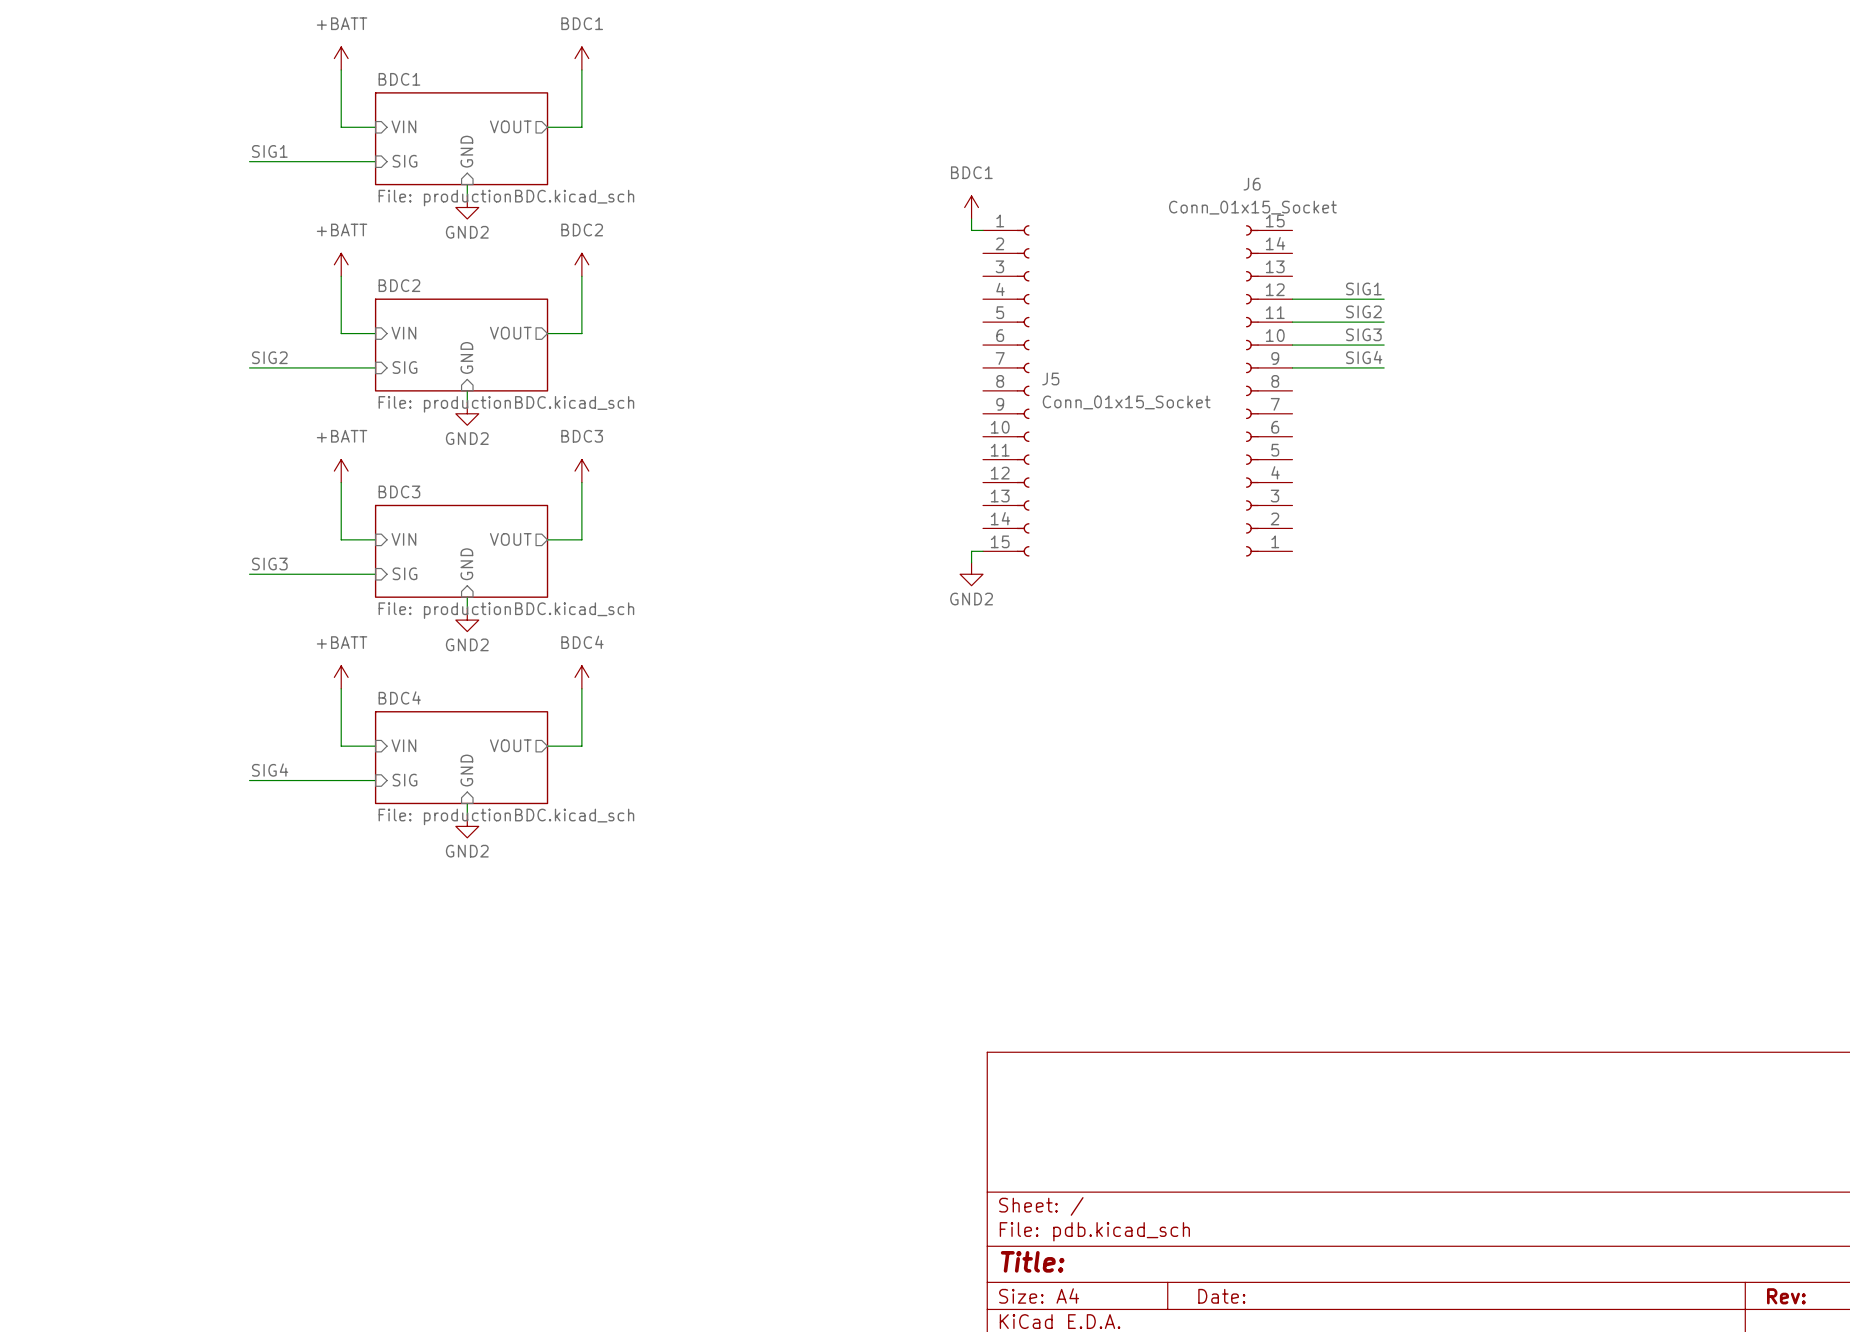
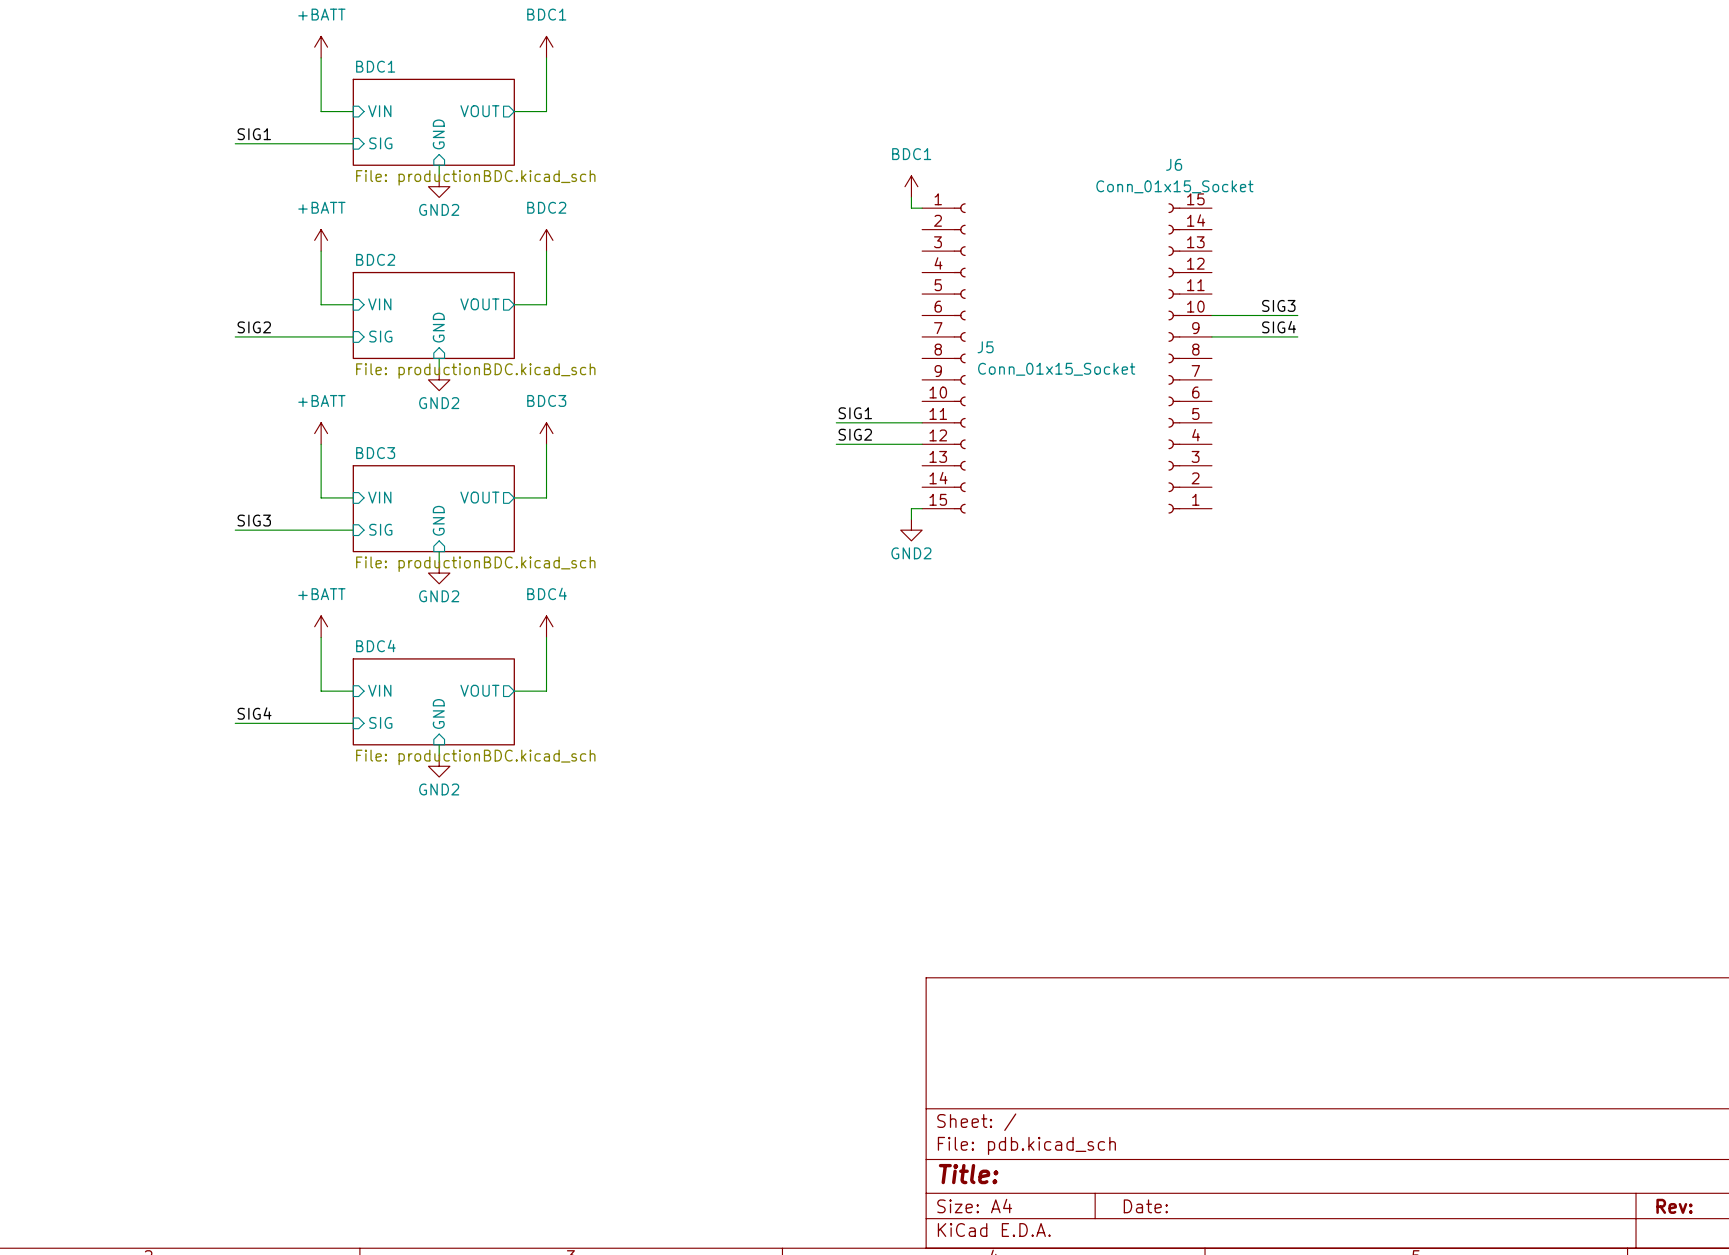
label: SIG1 (1363, 288) -> none
wire: (1292, 299) (1384, 299) -> none
label: SIG2 (1363, 311) -> none
wire: (1292, 322) (1384, 322) -> none
label: none -> SIG1 (855, 413)
wire: none -> (836, 422) (922, 422)
label: none -> SIG2 (855, 434)
wire: none -> (836, 444) (922, 444)

